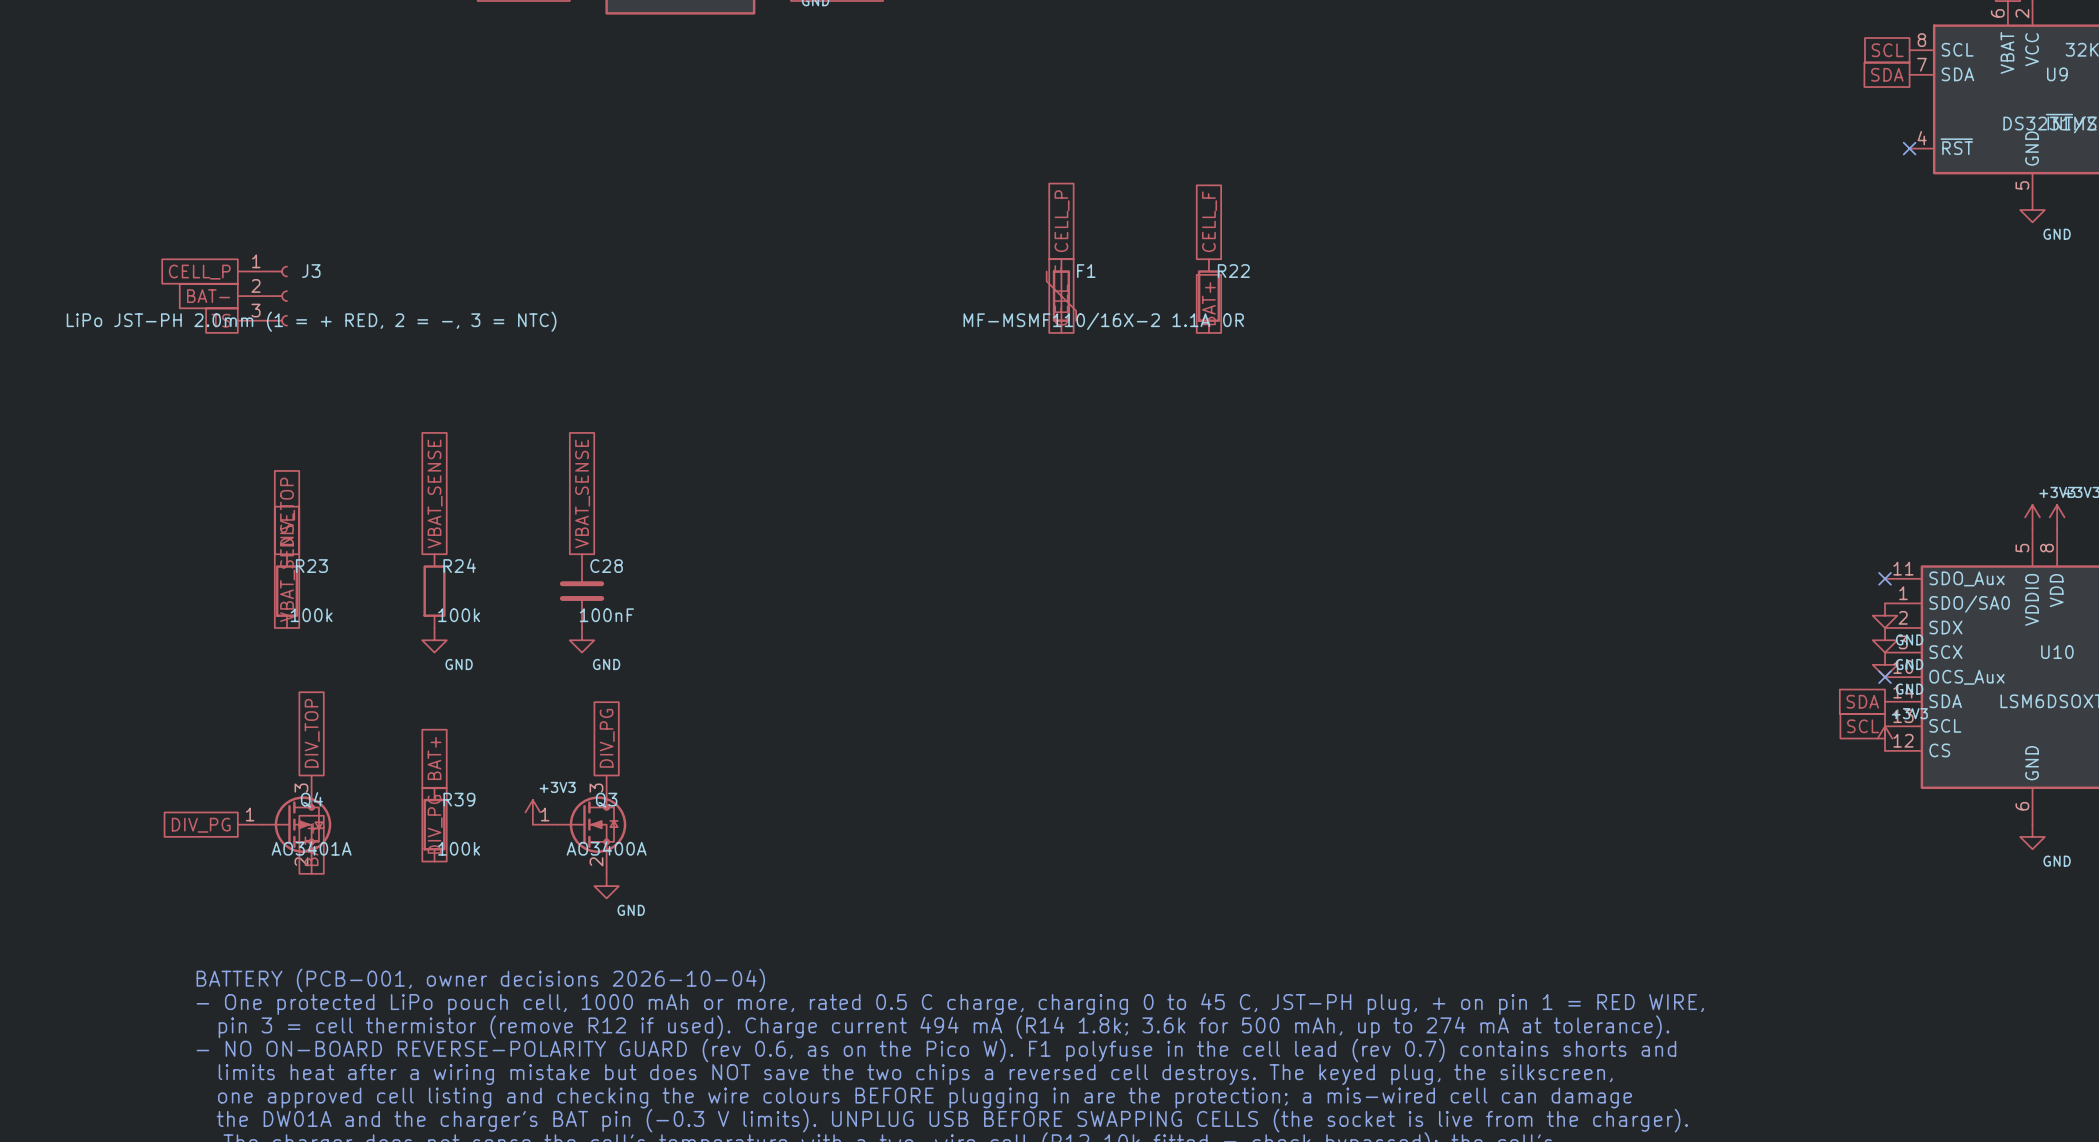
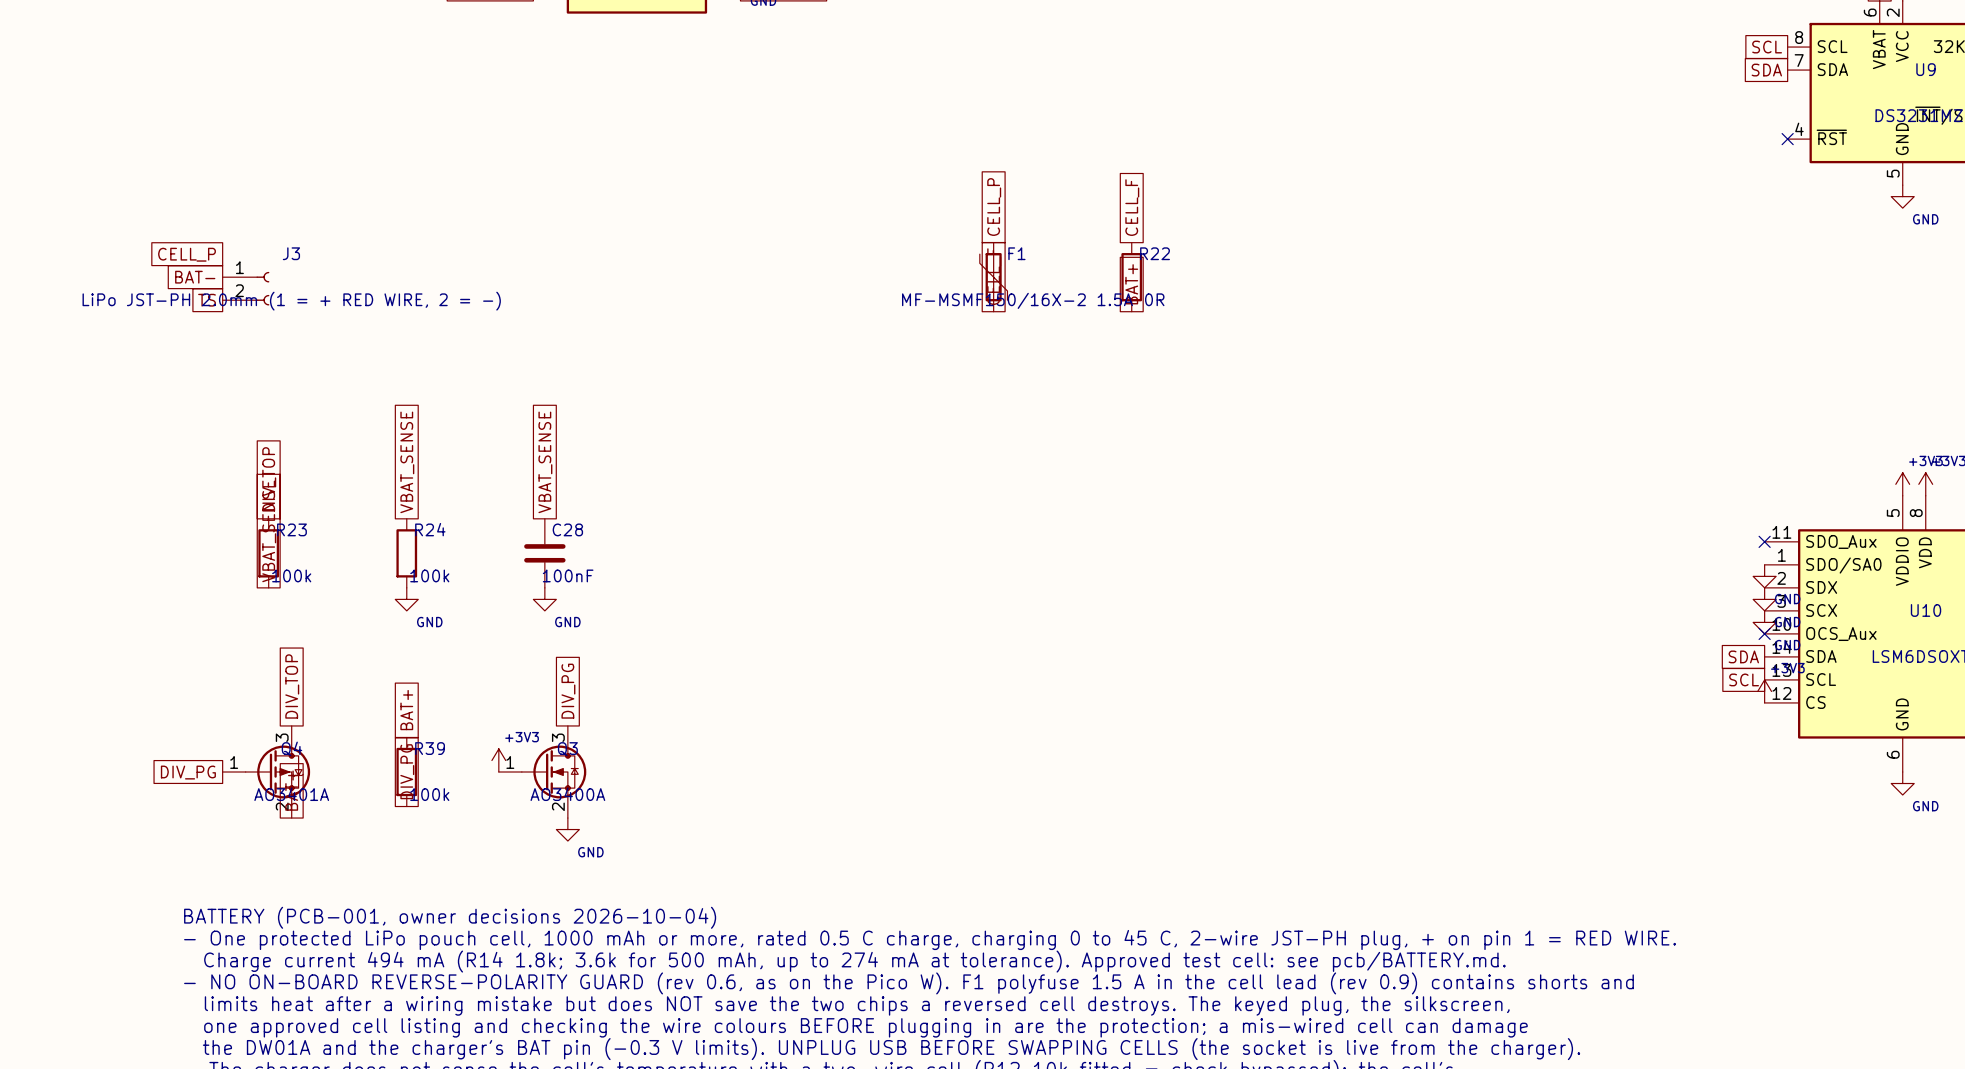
J3 symbol: [237, 265, 288, 327] -> [222, 271, 270, 306]
J3 value: LiPo JST-PH 2.0mm (1 = + RED, 2 = -, 3 = NTC) (311, 321) -> LiPo JST-PH 2.0mm (1 = + RED WIRE, 2 = -) (291, 301)
F1 value: MF-MSMF110/16X-2 1.1A (1086, 321) -> MF-MSMF150/16X-2 1.5A (1017, 300)
text: - One protected LiPo pouch cell, 1000 mAh or more, rated 0.5 C charge, charging 0 to 45 C, JST-PH plug, + on pin 1 = RED WIRE, (950, 1004) -> - One protected LiPo pouch cell, 1000 mAh or more, rated 0.5 C charge, charging 0 to 45 C, 2-wire JST-PH plug, + on pin 1 = RED WIRE. (930, 939)
text: pin 3 = cell thermistor (remove R12 if used). Charge current 494 mA (R14 1.8k; 3.6k for 500 mAh, up to 274 mA at tolerance). (944, 1027) -> Charge current 494 mA (R14 1.8k; 3.6k for 500 mAh, up to 274 mA at tolerance). Approved test cell: see pcb/BATTERY.md. (854, 961)
text: - NO ON-BOARD REVERSE-POLARITY GUARD (rev 0.6, as on the Pico W). F1 polyfuse in the cell lead (rev 0.7) contains shorts and (936, 1050) -> - NO ON-BOARD REVERSE-POLARITY GUARD (rev 0.6, as on the Pico W). F1 polyfuse 1.5 A in the cell lead (rev 0.9) contains shorts and (908, 983)

